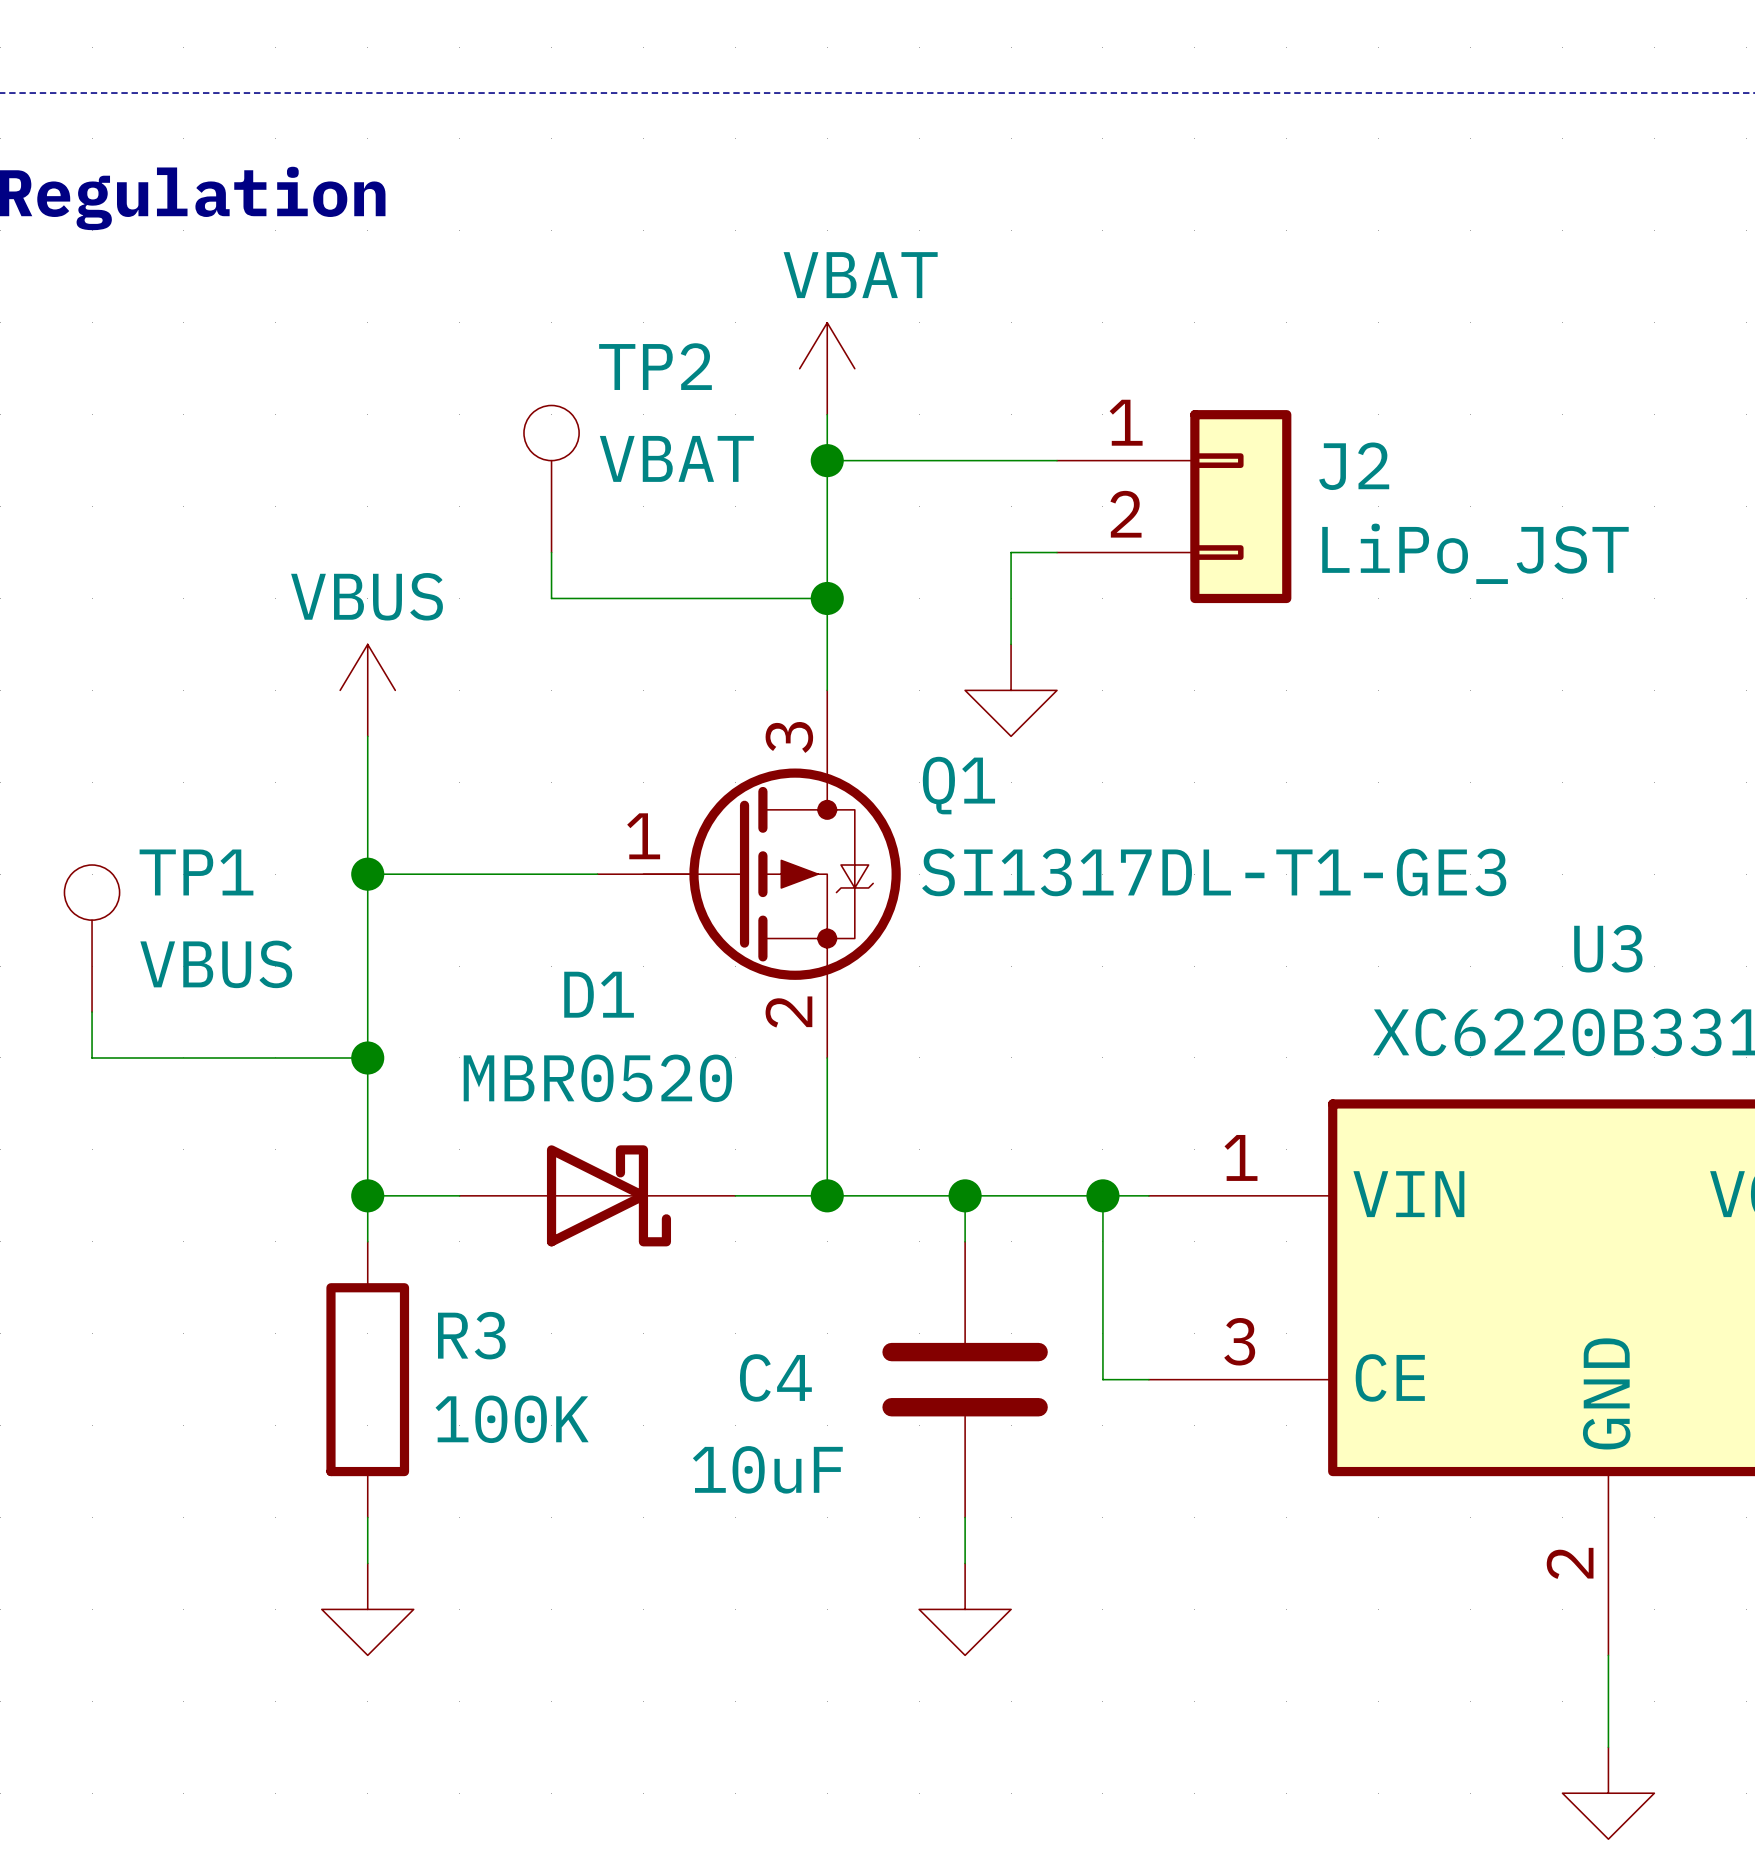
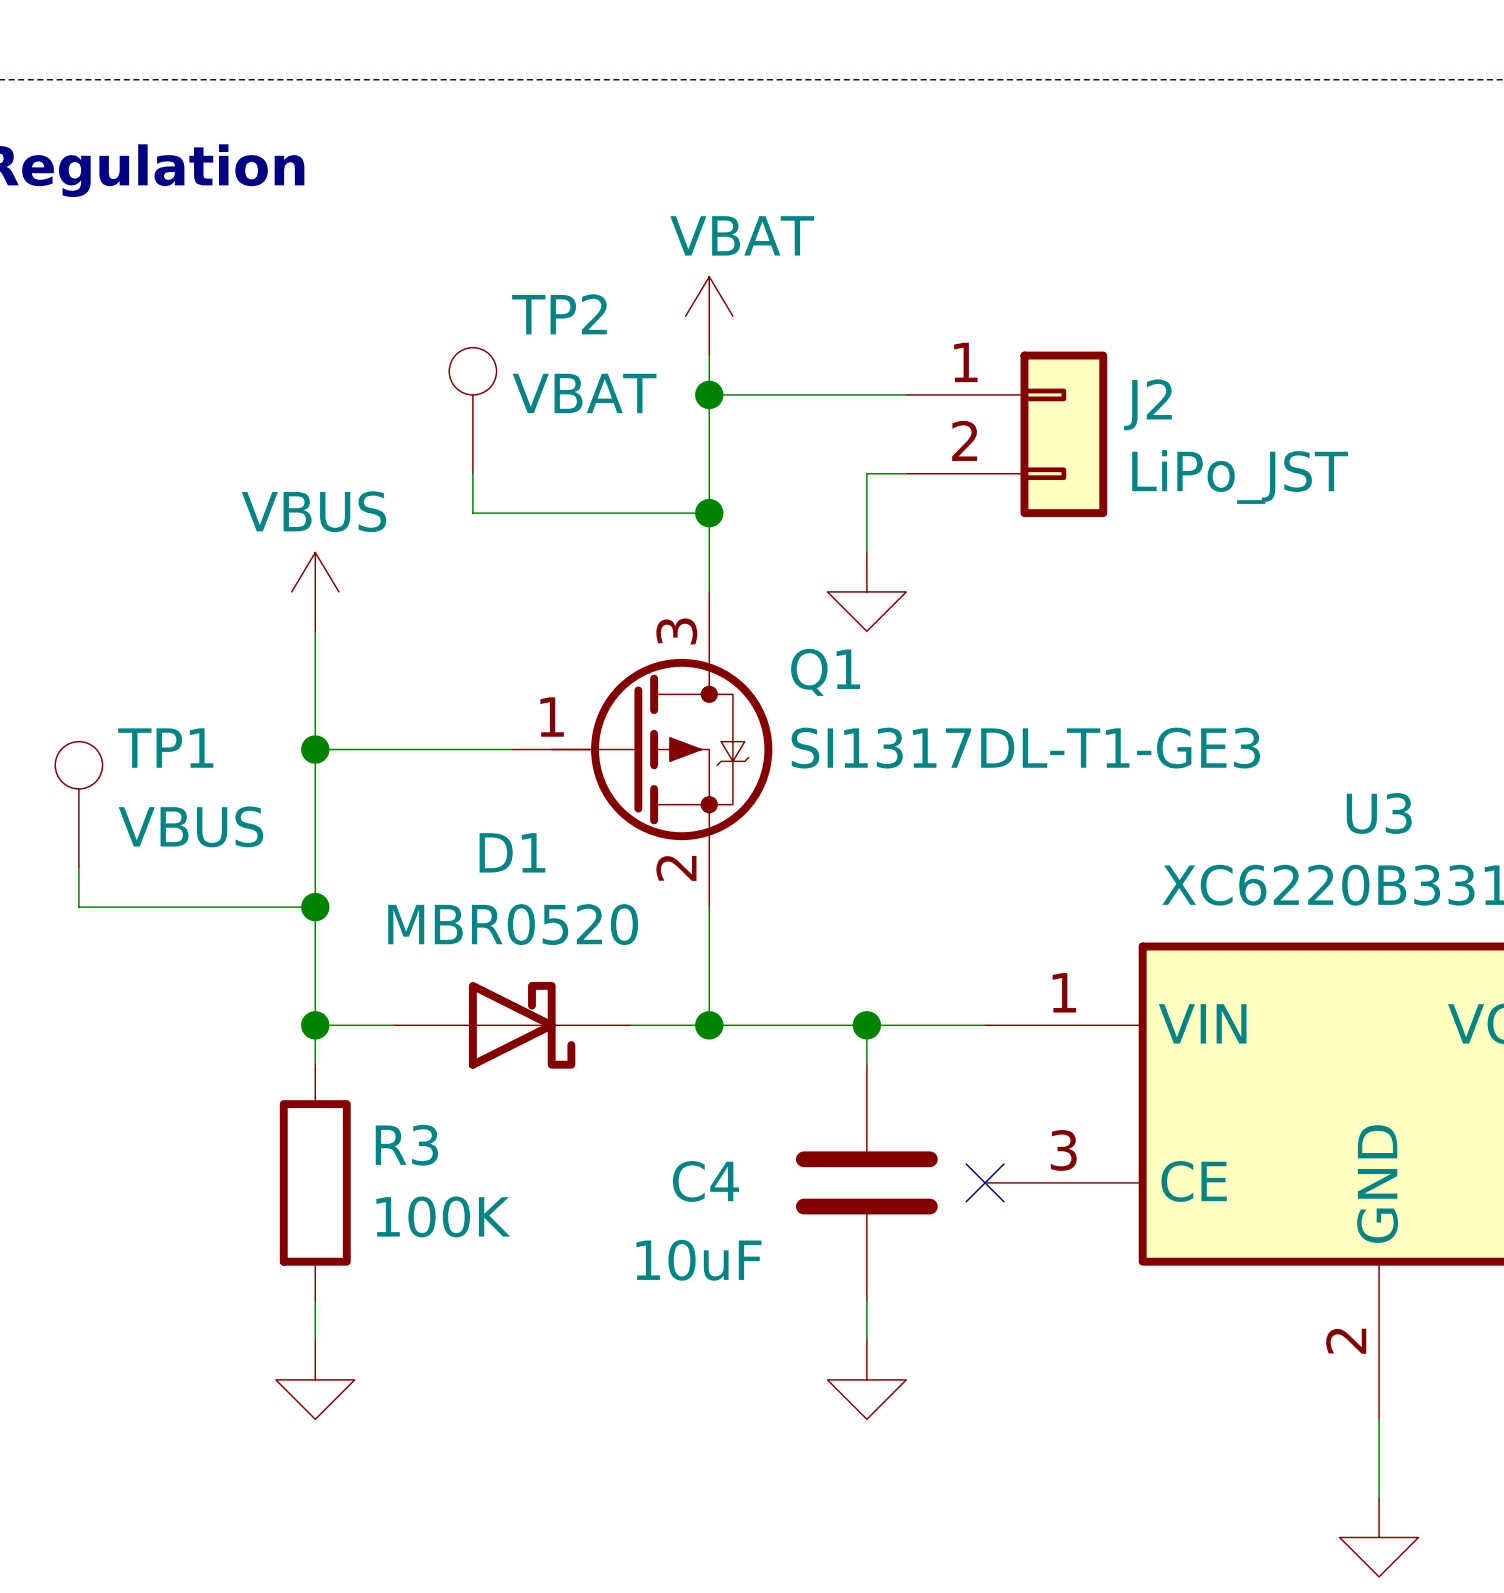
wire: (965, 1195) (965, 1241) -> (866, 1025) (866, 1064)
junction: (965, 1195) -> none
junction: none -> (866, 1025)
wire: (1102, 1195) (1102, 1379) (1148, 1379) -> none
junction: (1102, 1195) -> none
C4 position: (965, 1379) -> (866, 1182)
no-connect mark: none -> (985, 1182)
wire: (965, 1517) (965, 1563) -> (866, 1301) (866, 1340)
power symbol position: (965, 1609) -> (866, 1379)

